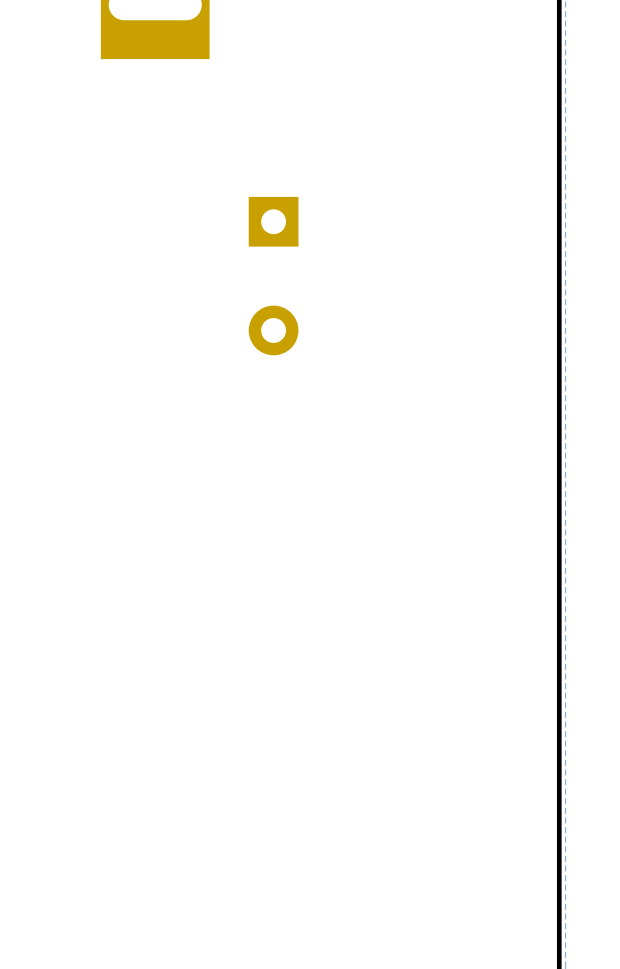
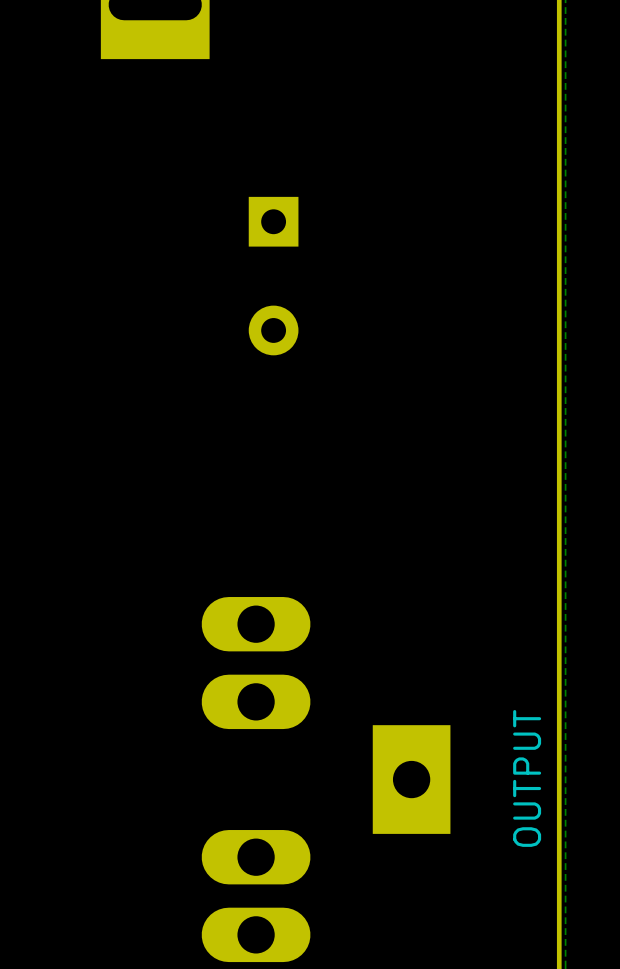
text: none -> OUTPUT (527, 778)
part: none -> (326, 779)

